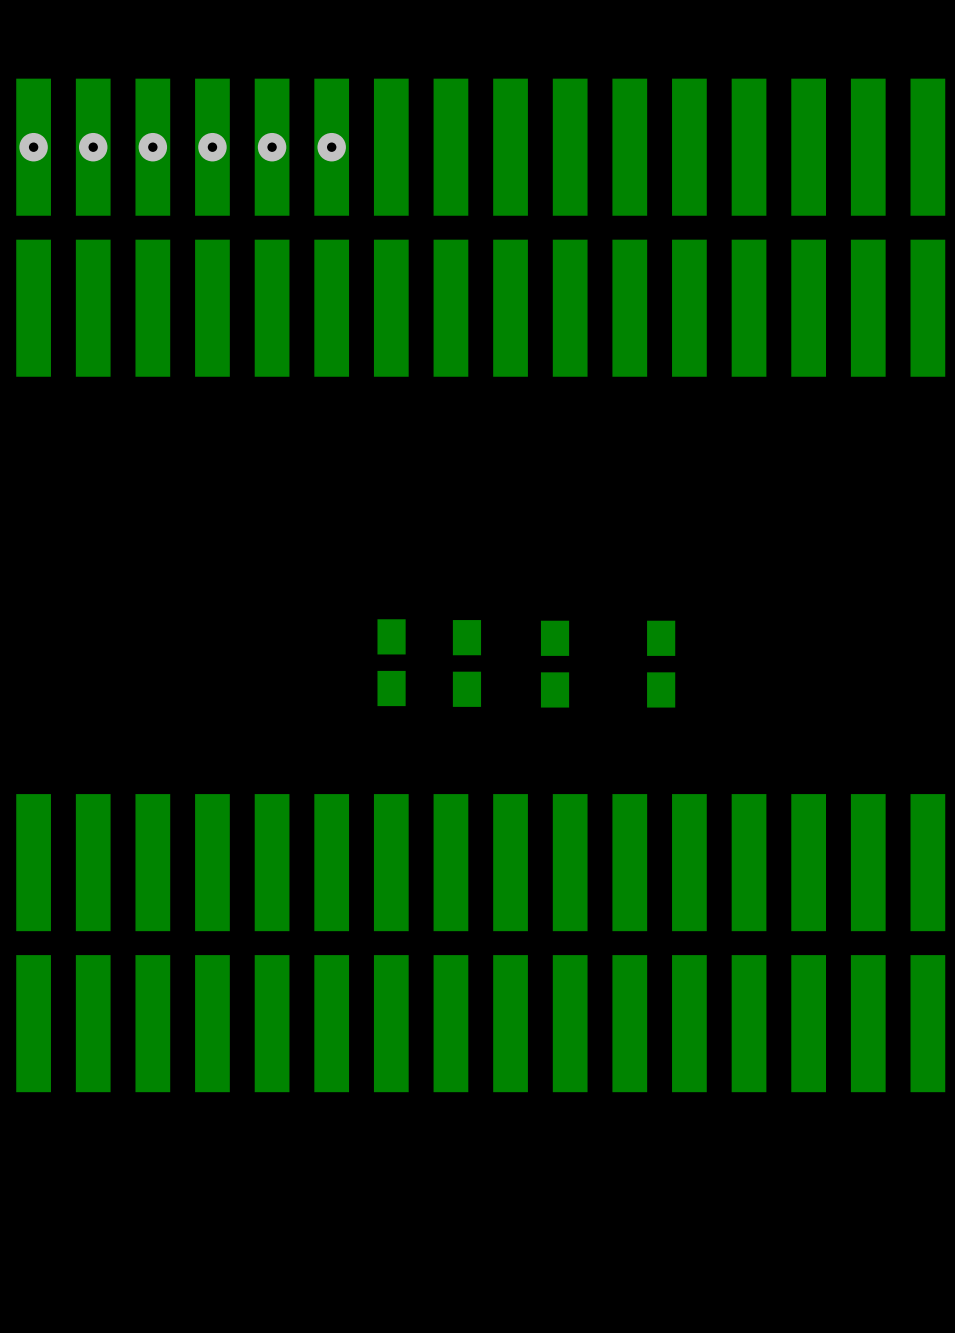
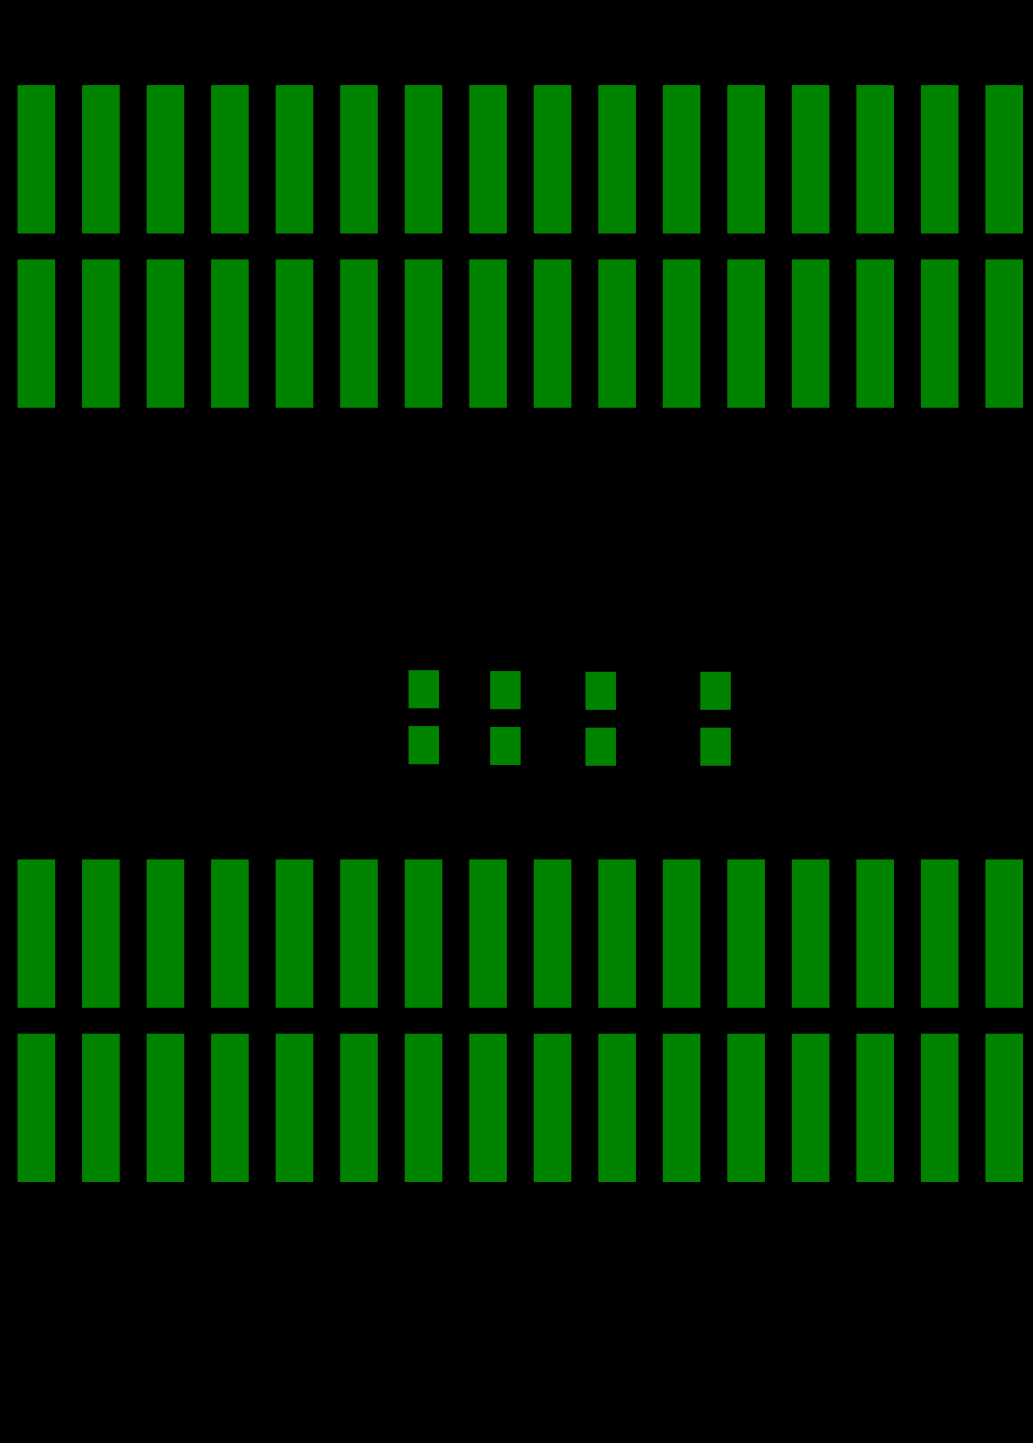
via: (33, 147) -> none
via: (93, 147) -> none
via: (152, 147) -> none
via: (212, 147) -> none
via: (272, 147) -> none
via: (331, 147) -> none

